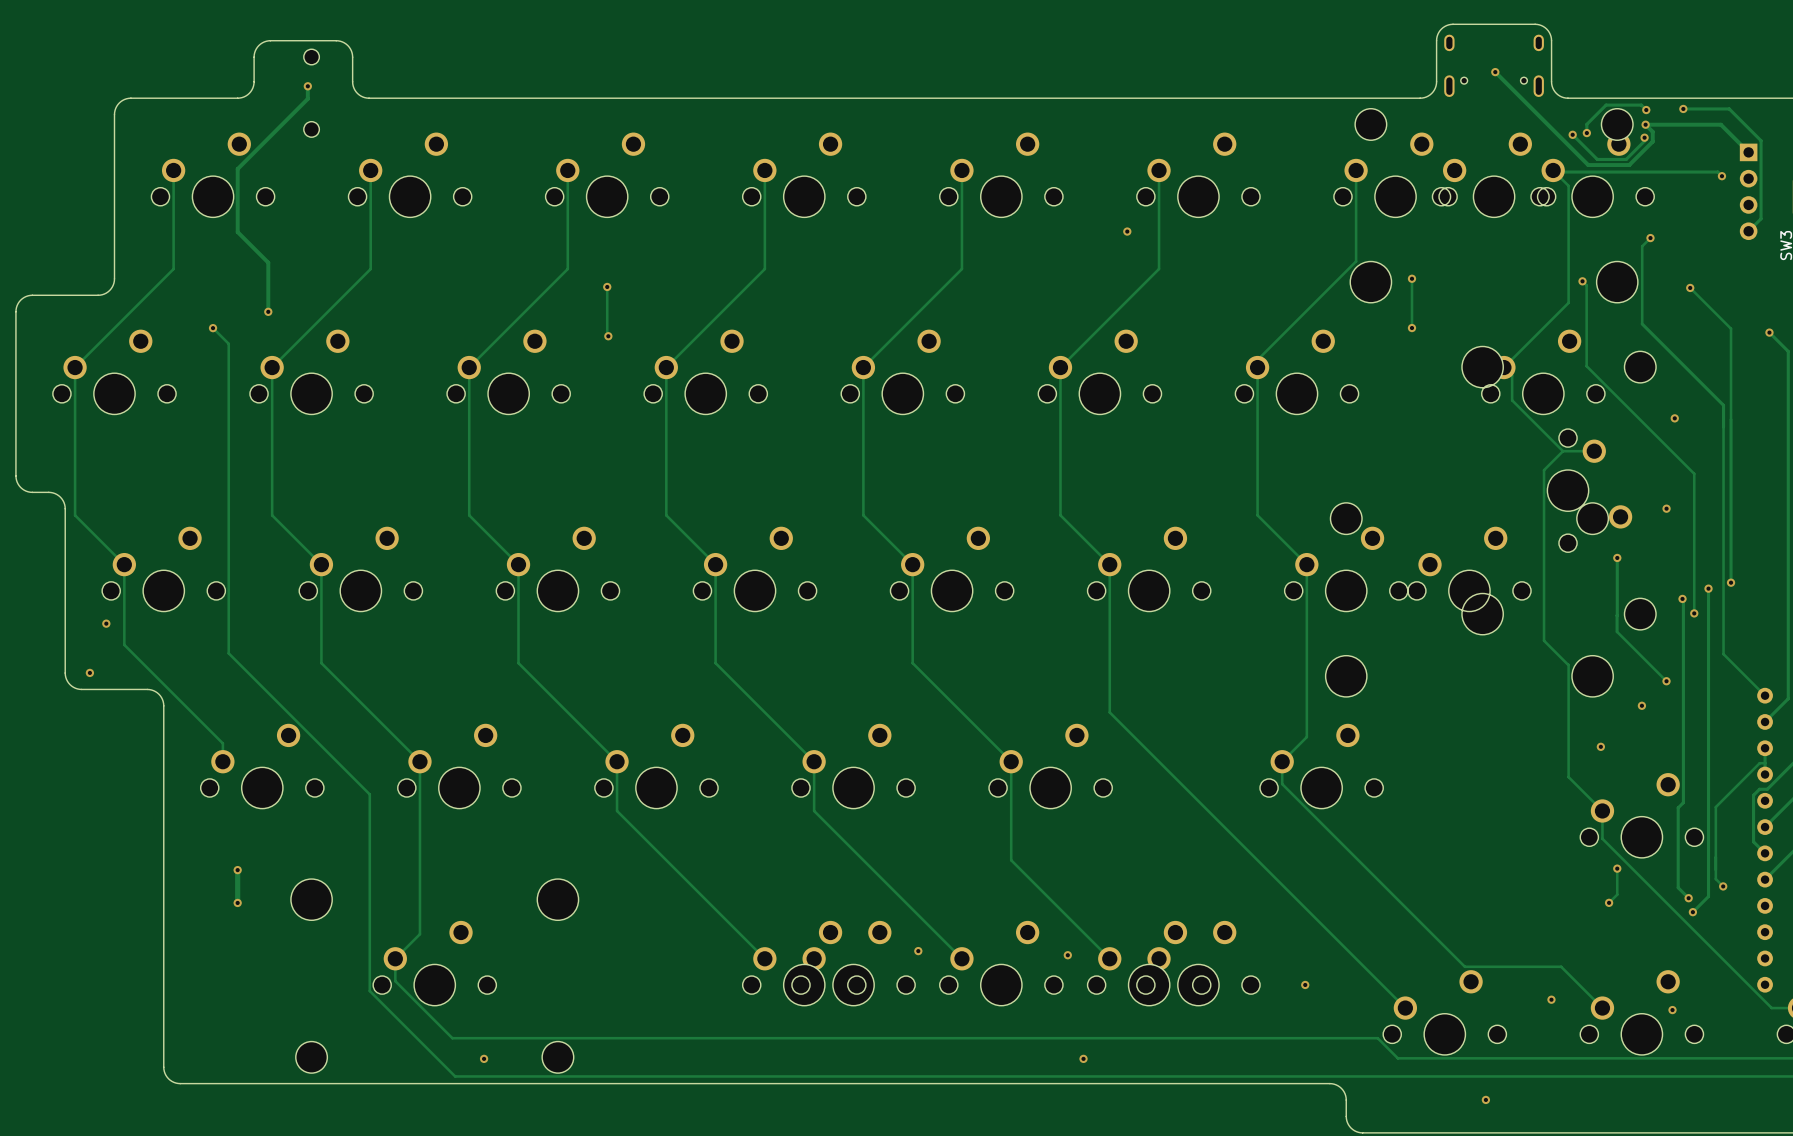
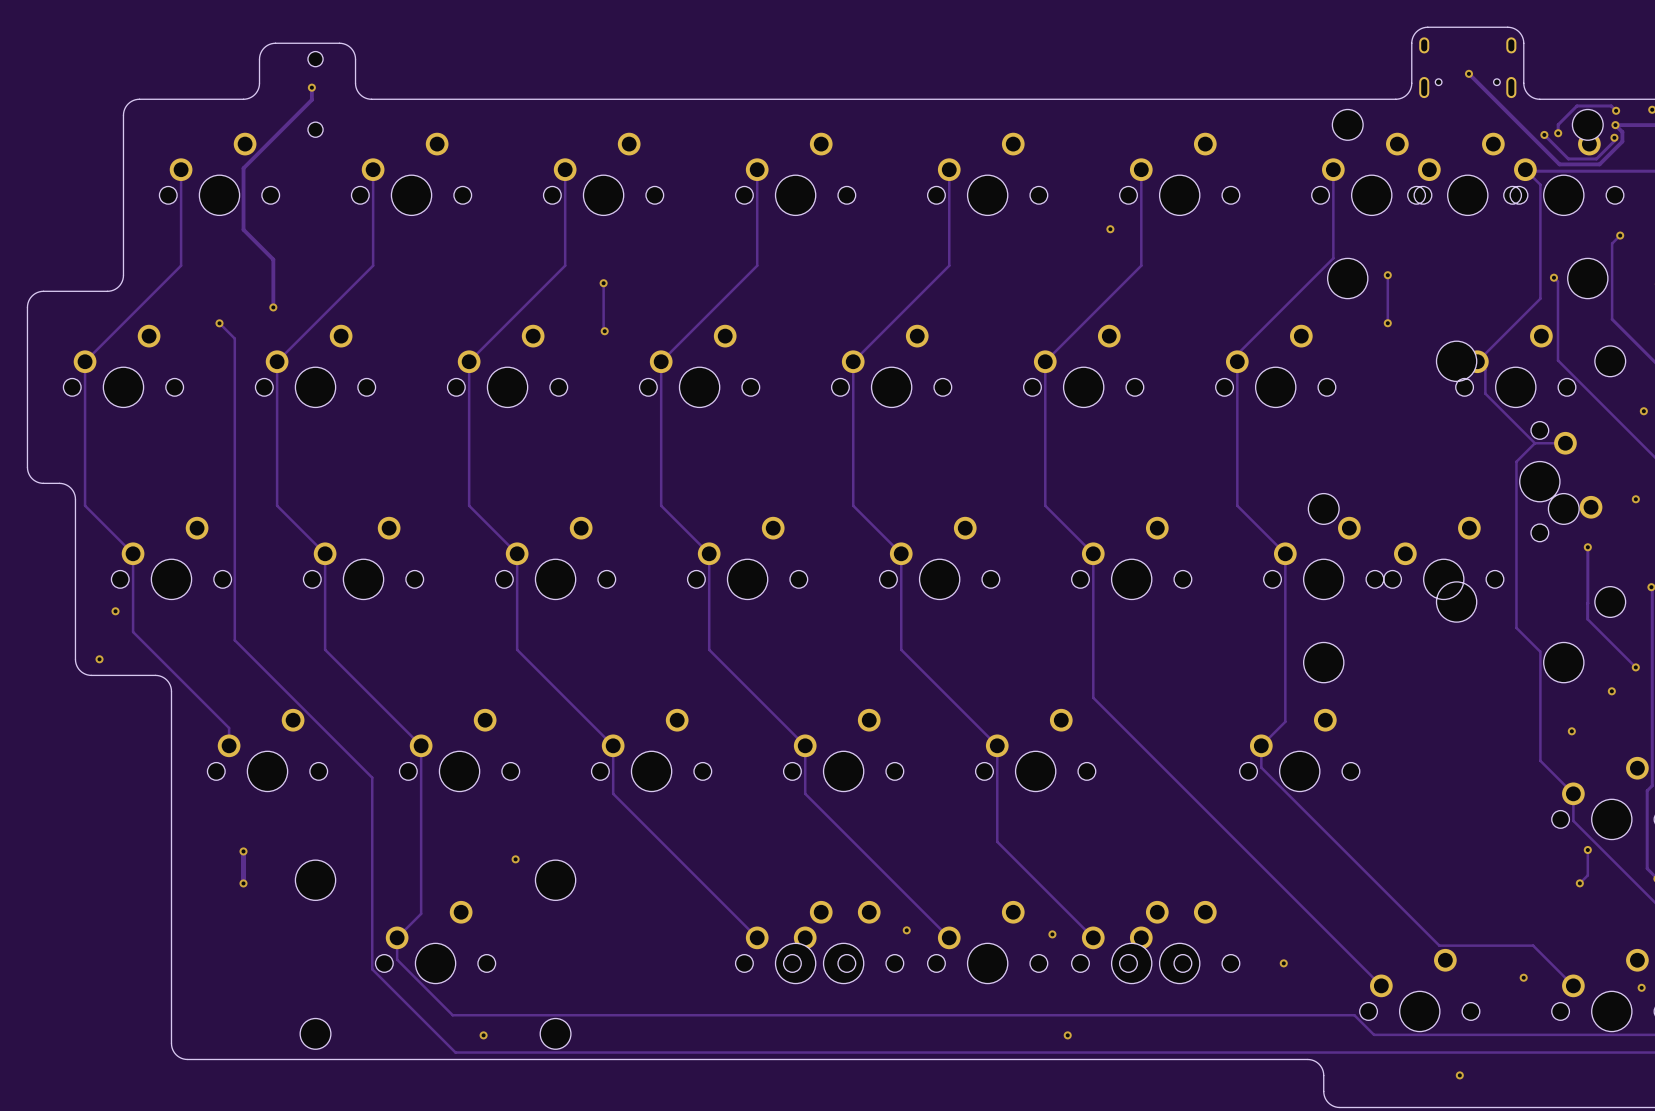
via: none -> (515, 859)

